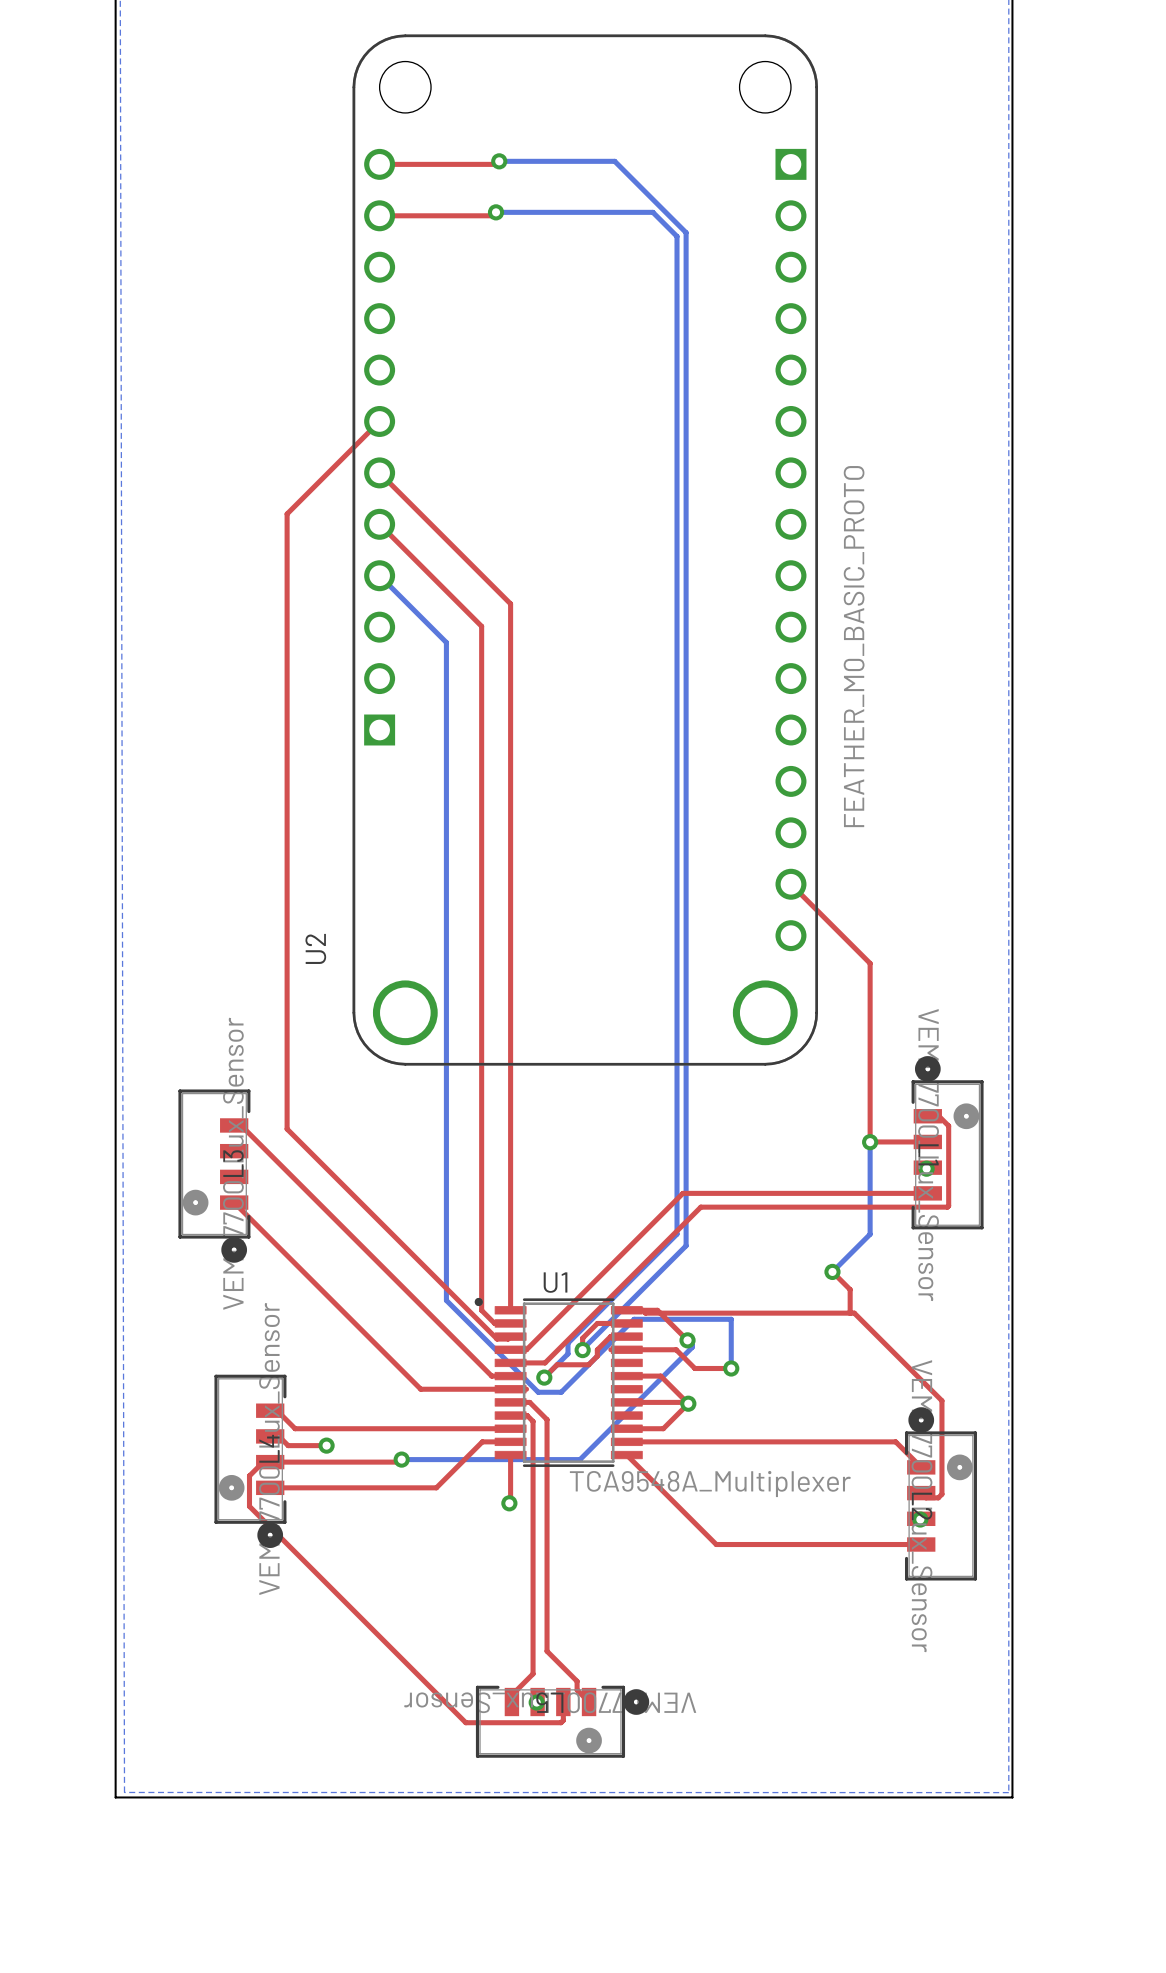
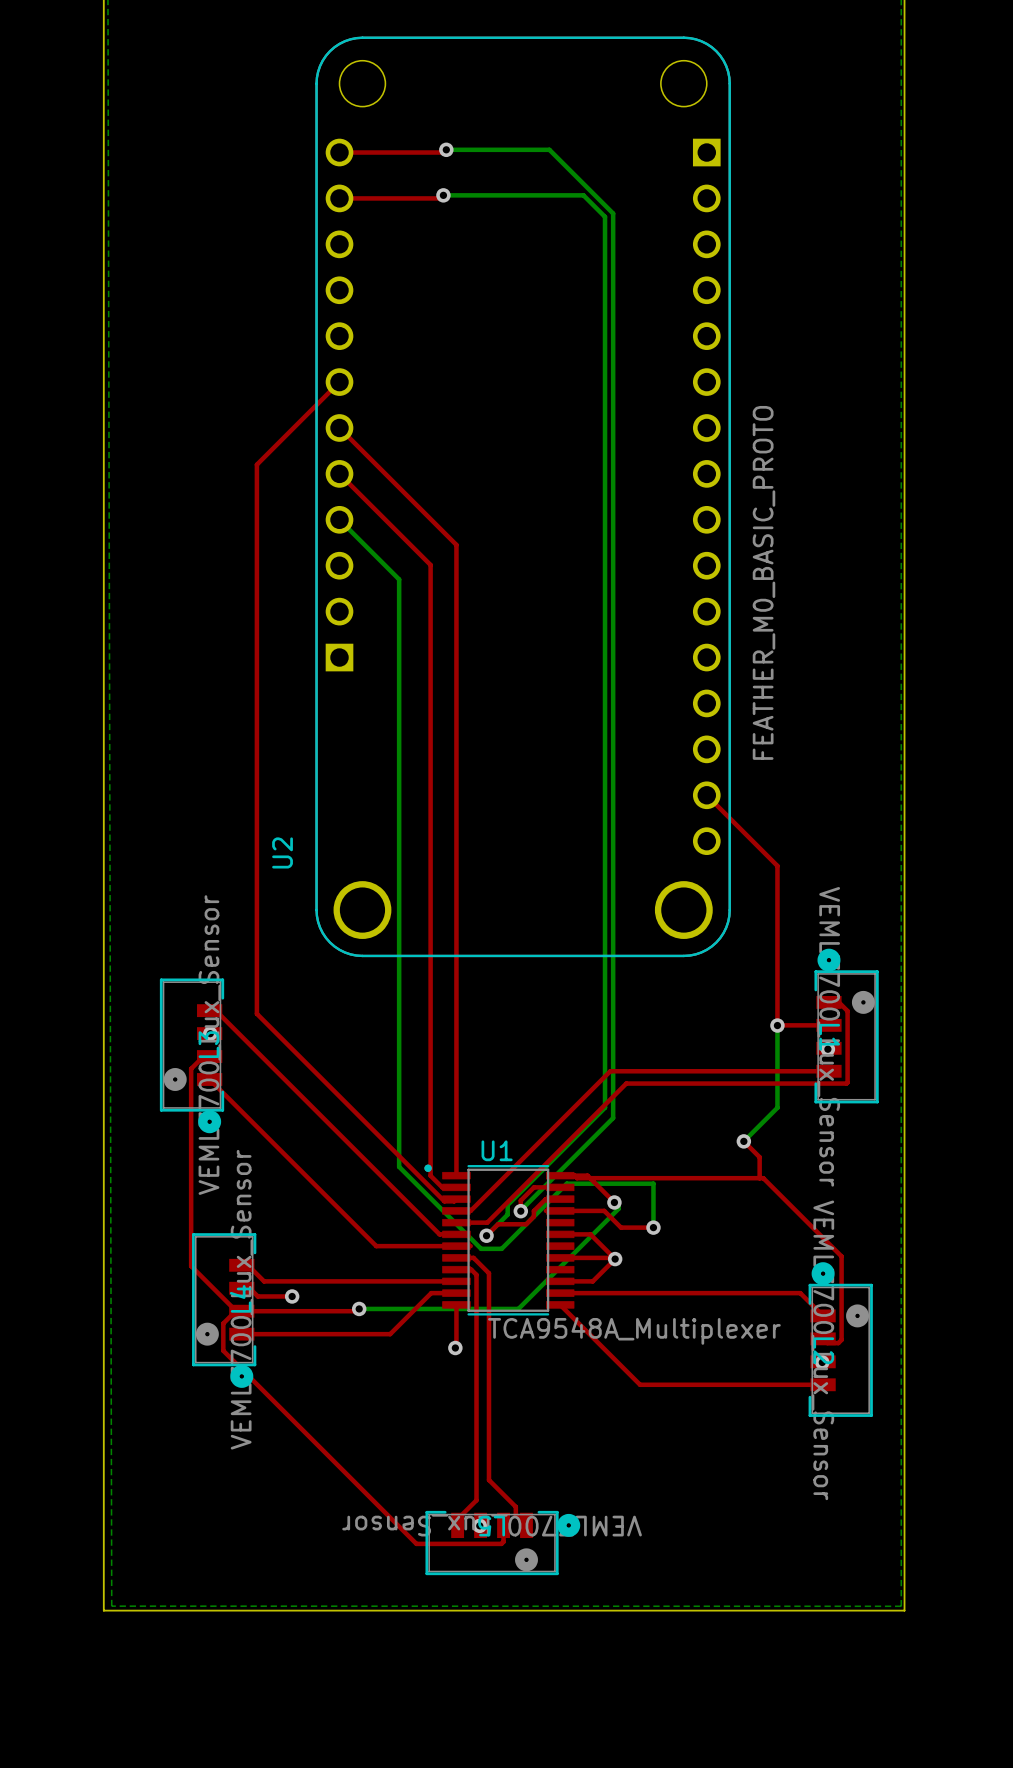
via: none -> (210, 1033)
top track: none -> (209, 1056) (203, 1056) (191, 1068) (191, 1266) (236, 1311)

